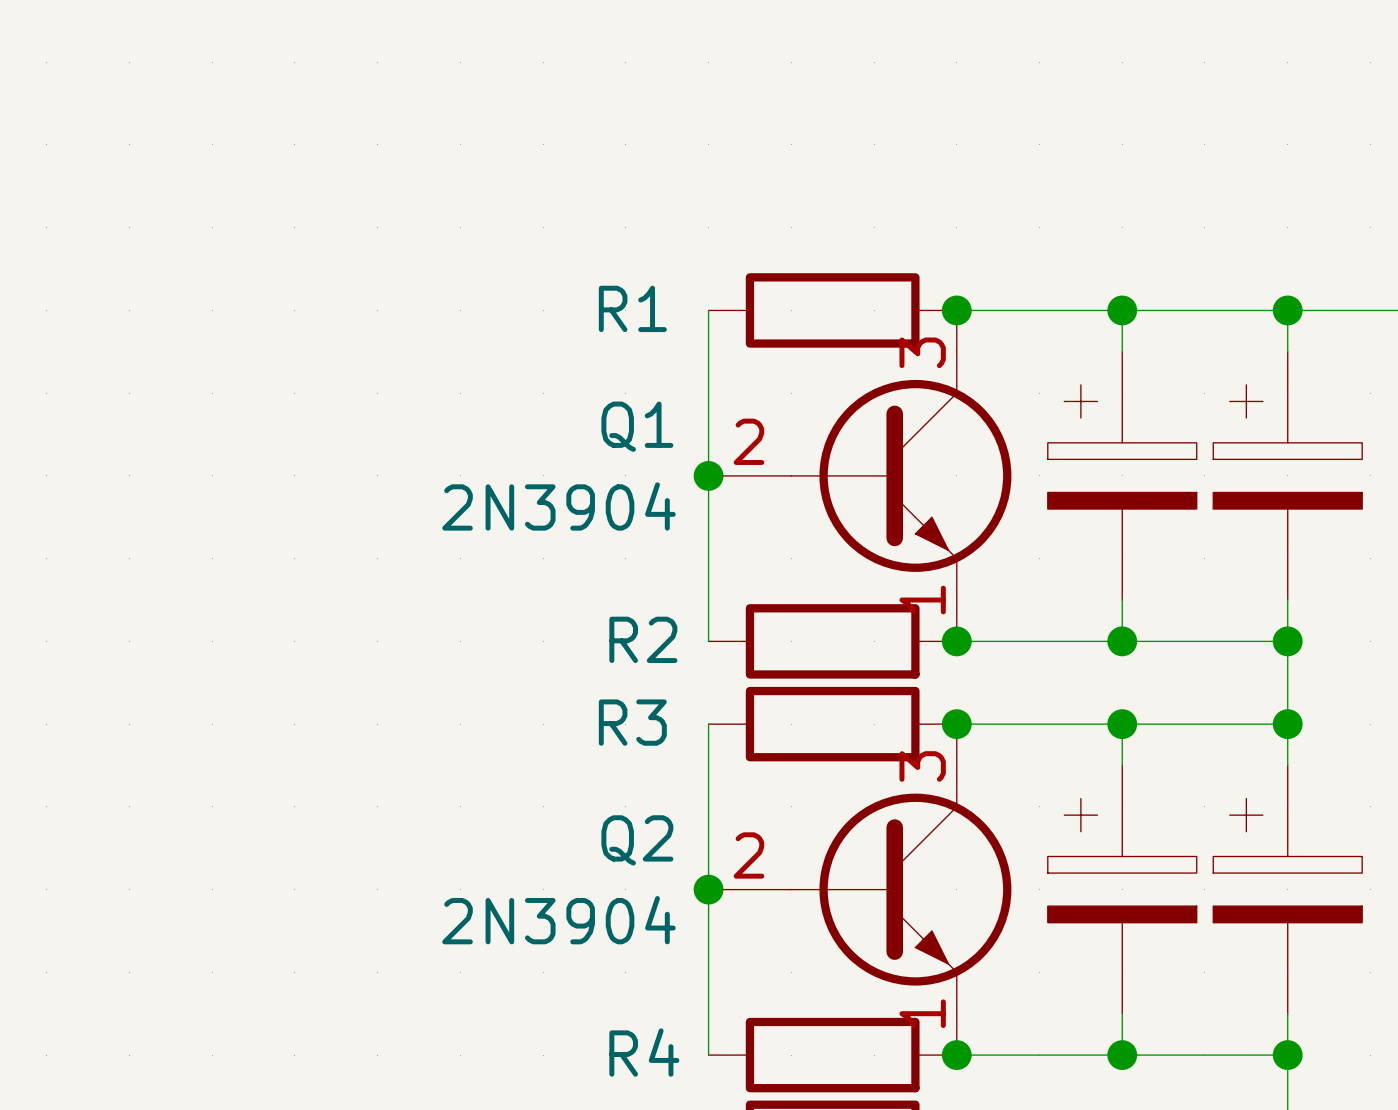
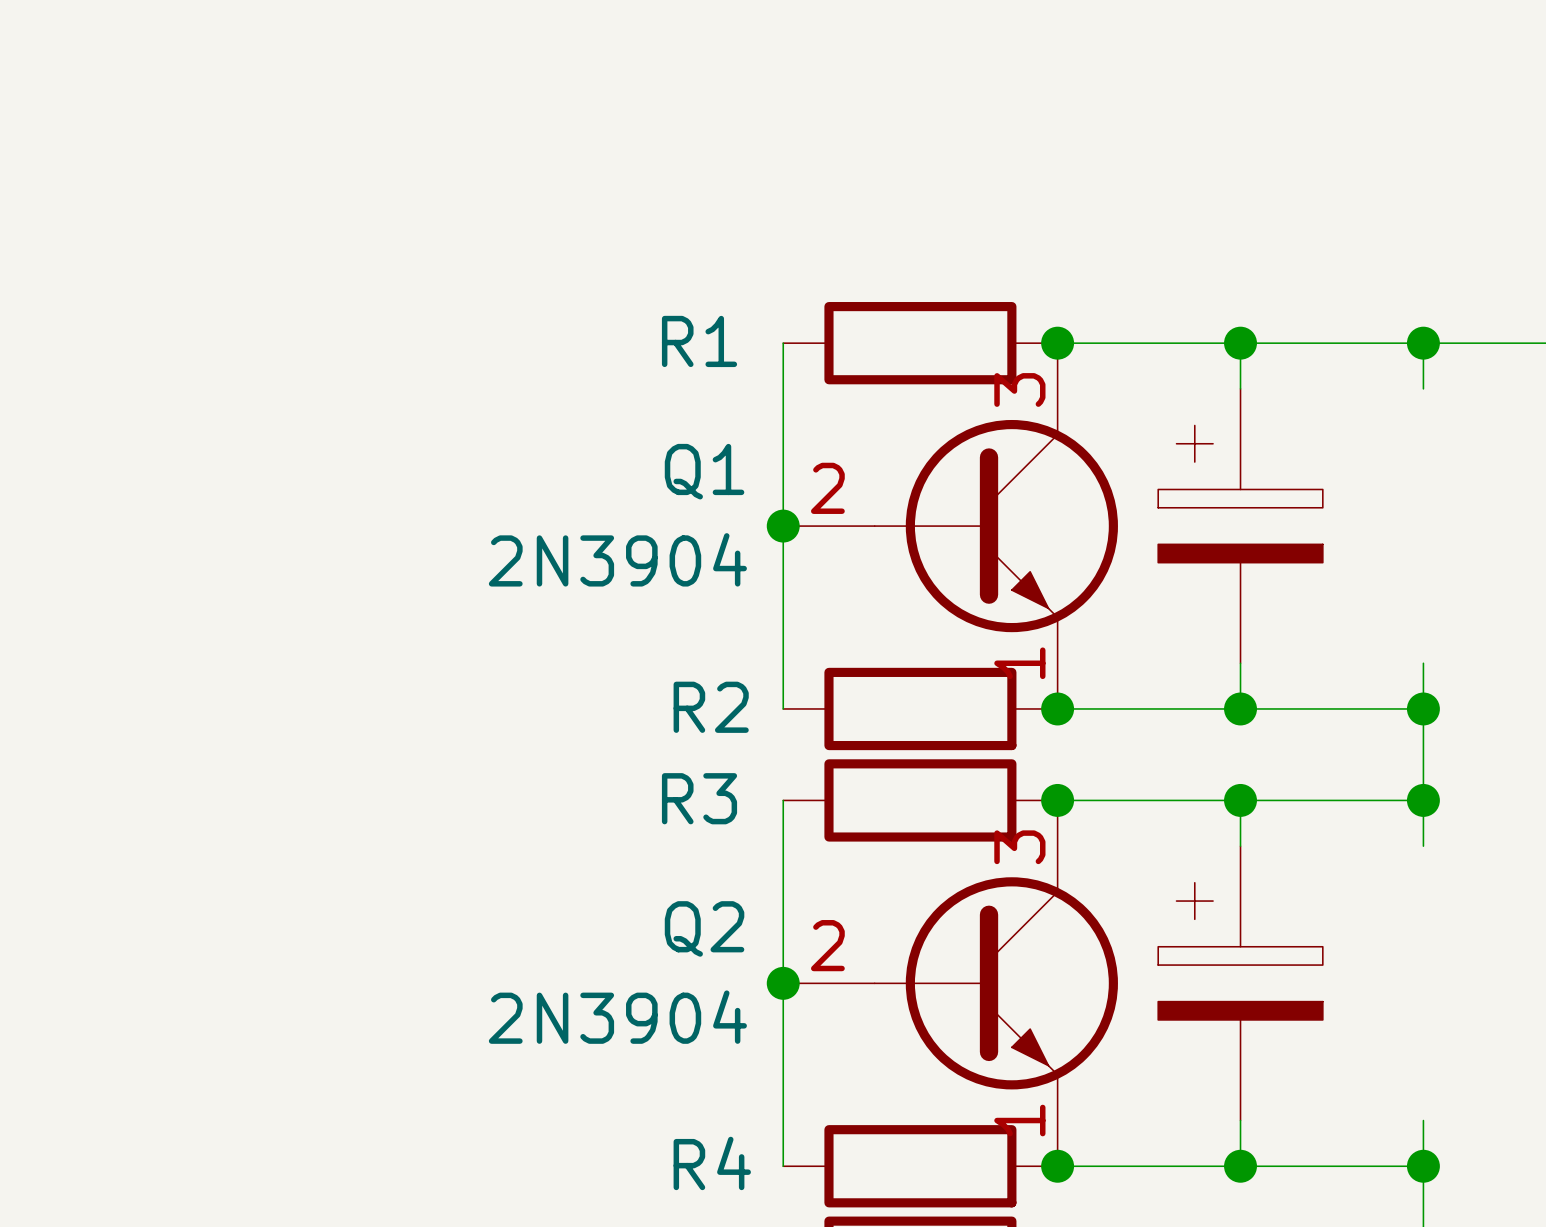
part: (1287, 475) -> none
part: (1287, 889) -> none

